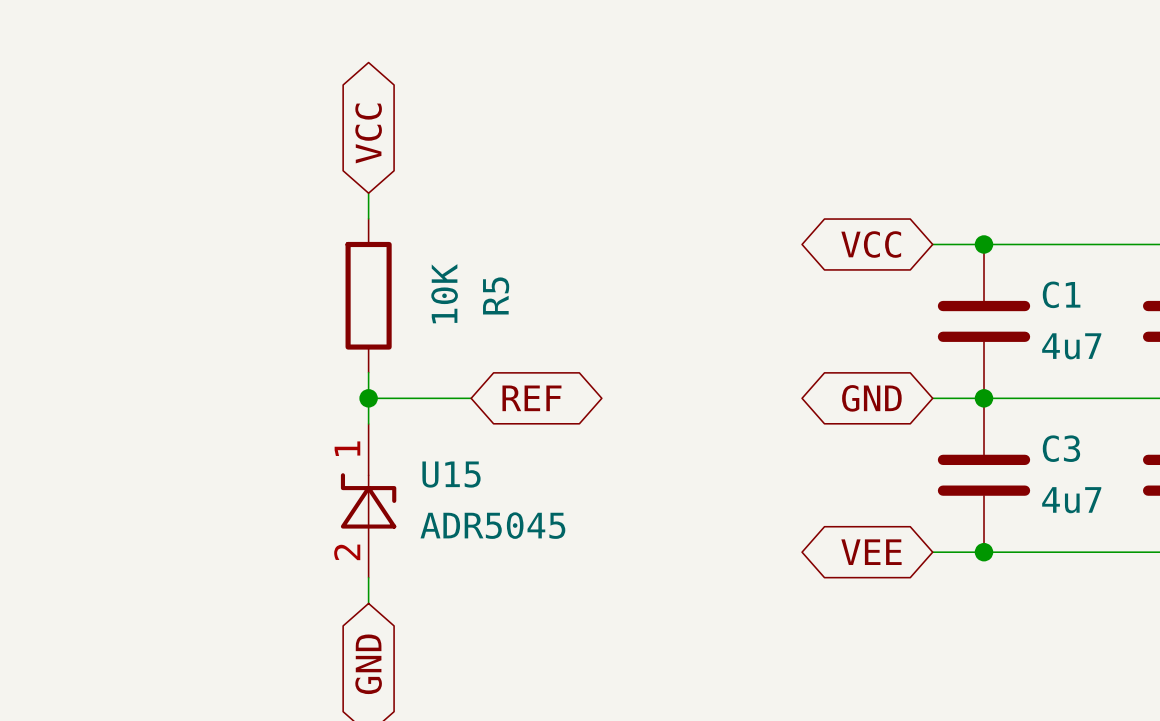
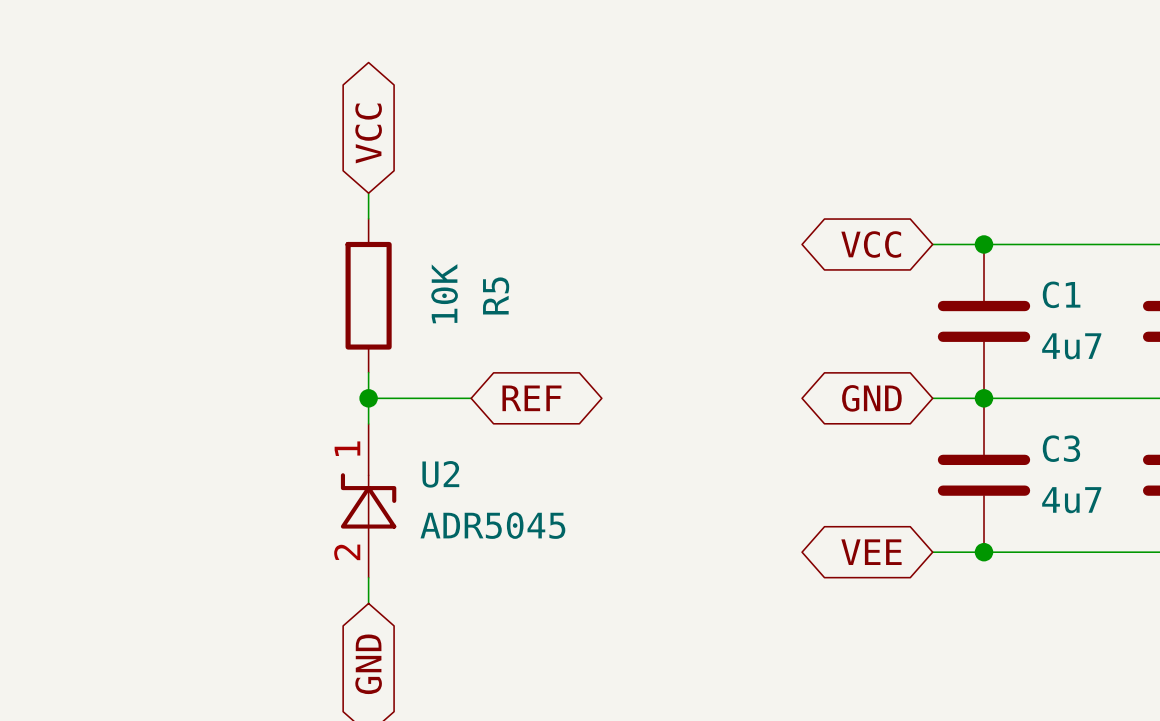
U15 name: U15 (451, 474) -> U2 (440, 474)

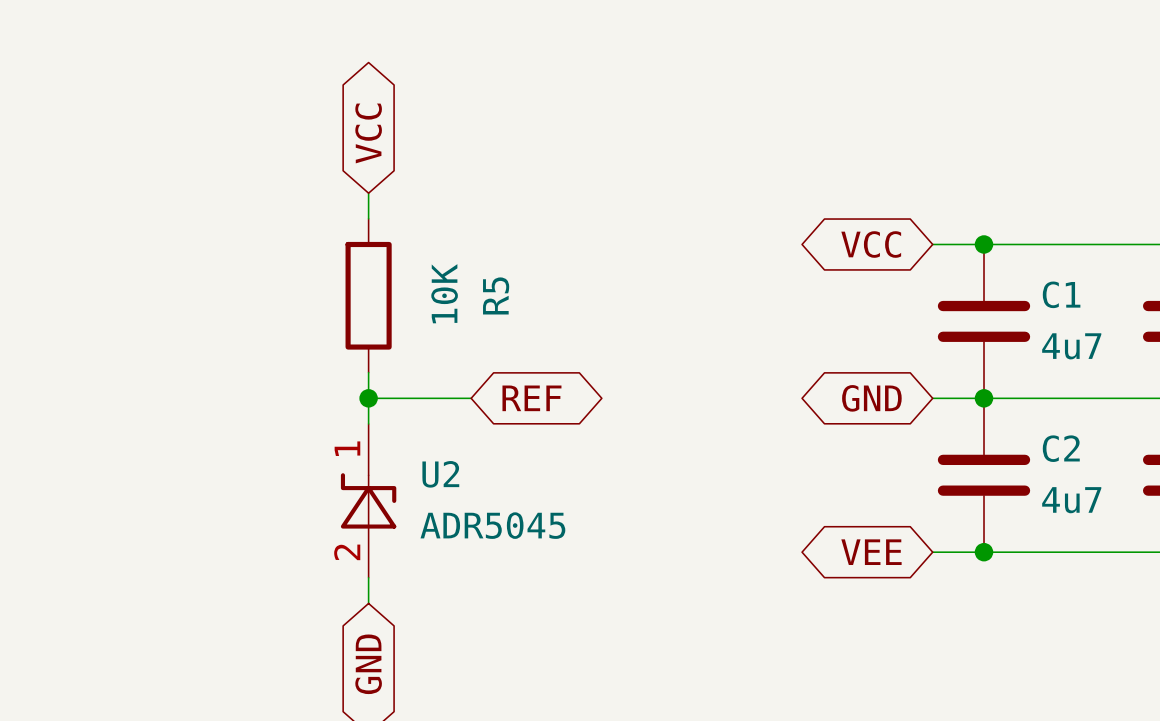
C3 name: C3 (1061, 448) -> C2 (1061, 448)

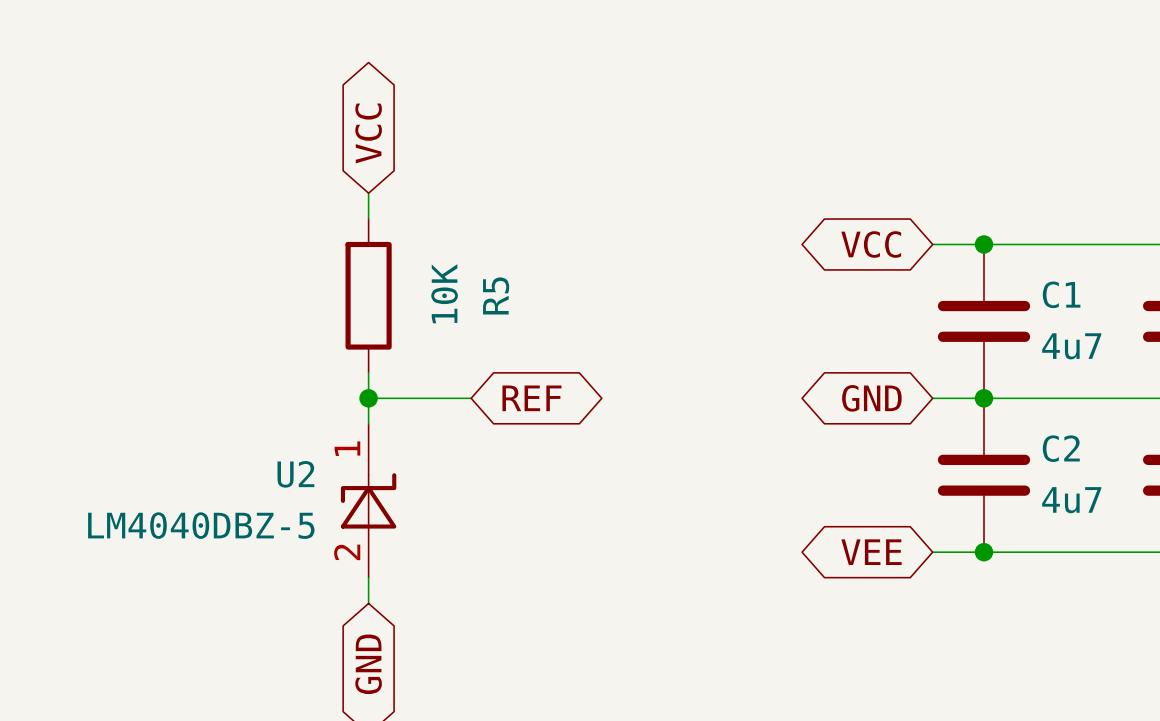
U2 flip: as is (368, 500) -> left-right (368, 500)
U2 value: ADR5045 (492, 525) -> LM4040DBZ-5 (201, 525)

